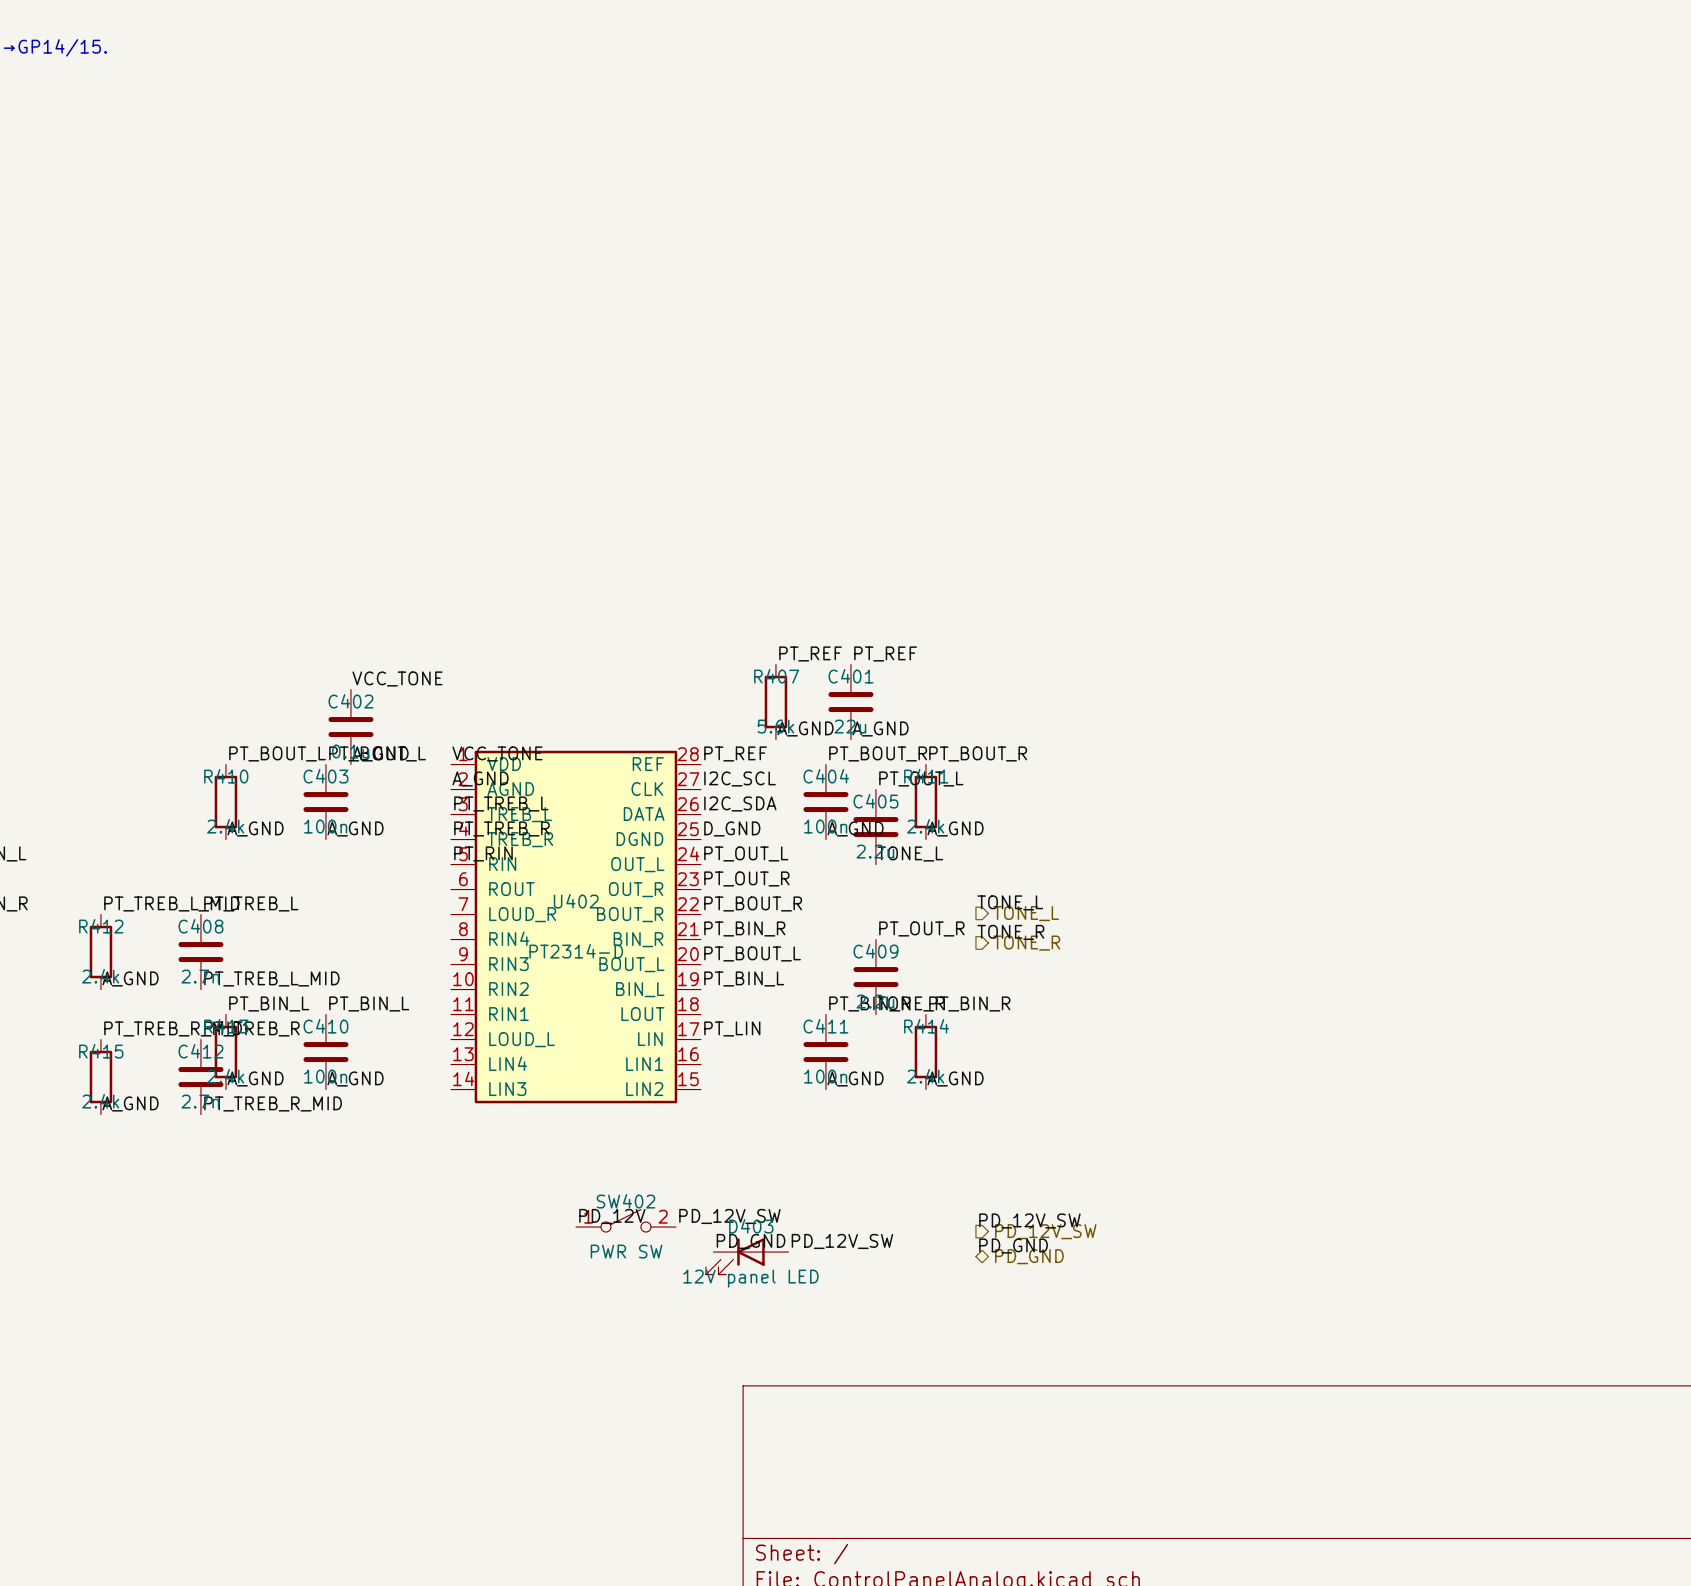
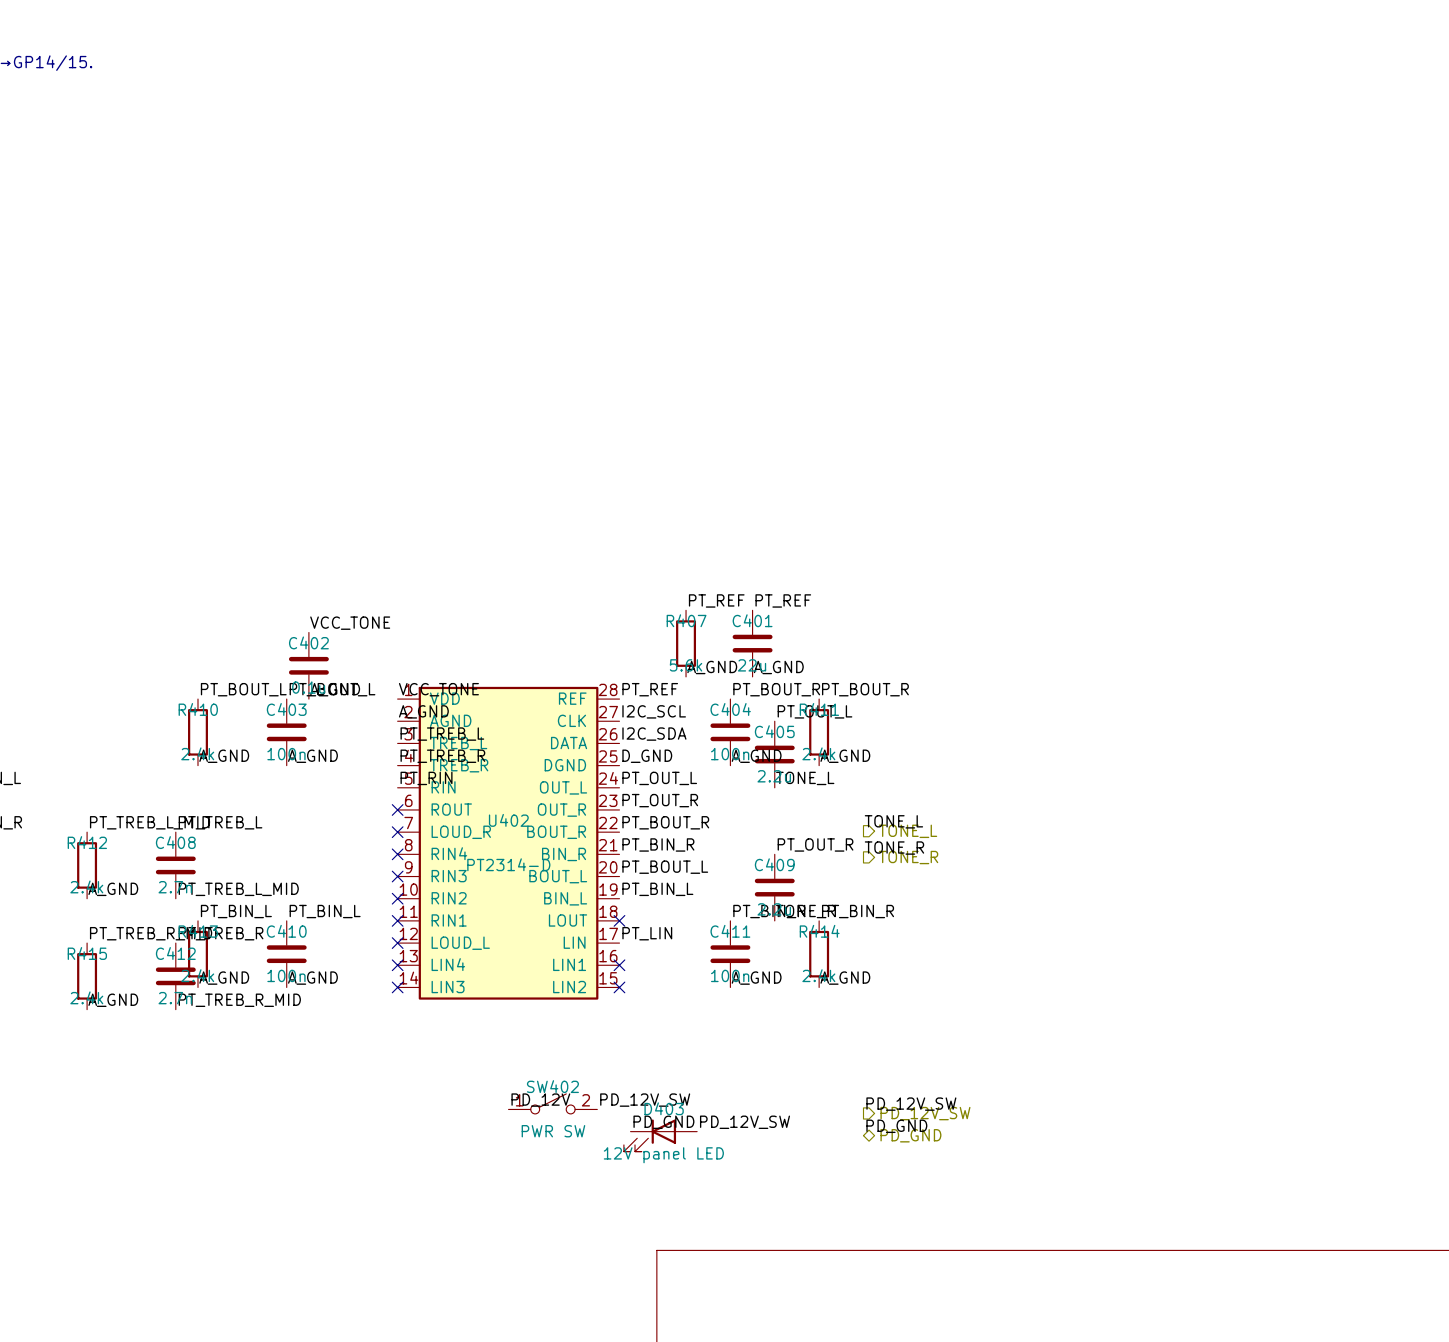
no-connect mark: none -> (397, 809)
no-connect mark: none -> (397, 832)
no-connect mark: none -> (397, 854)
no-connect mark: none -> (397, 876)
no-connect mark: none -> (397, 898)
no-connect mark: none -> (397, 920)
no-connect mark: none -> (619, 920)
no-connect mark: none -> (397, 943)
no-connect mark: none -> (397, 965)
no-connect mark: none -> (619, 965)
no-connect mark: none -> (397, 987)
no-connect mark: none -> (619, 987)

